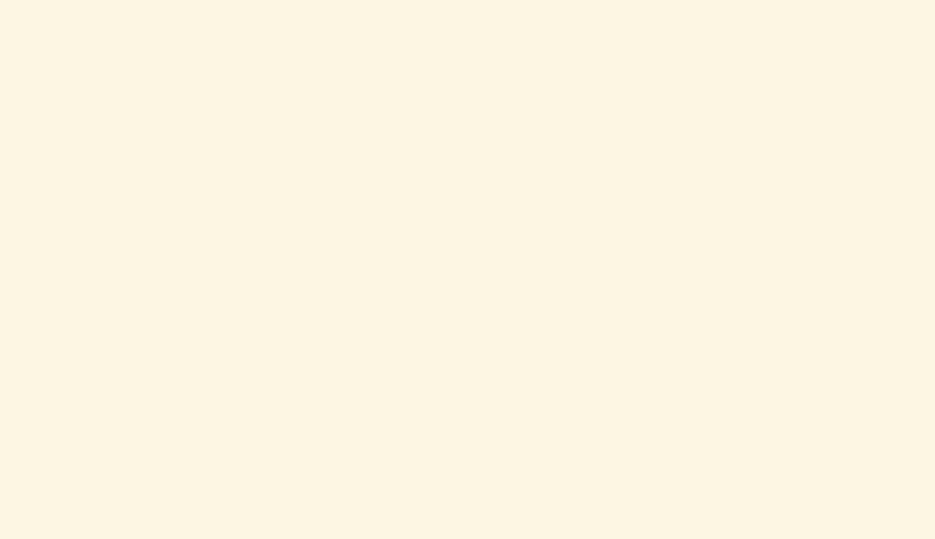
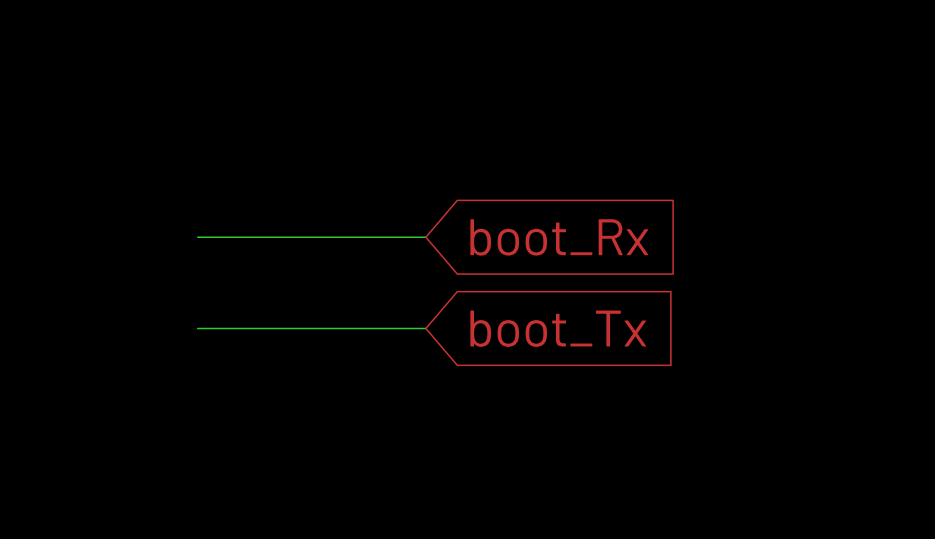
wire: none -> (197, 237) (425, 237)
global label: none -> boot_Rx (559, 237)
wire: none -> (197, 328) (425, 328)
global label: none -> boot_Tx (558, 328)

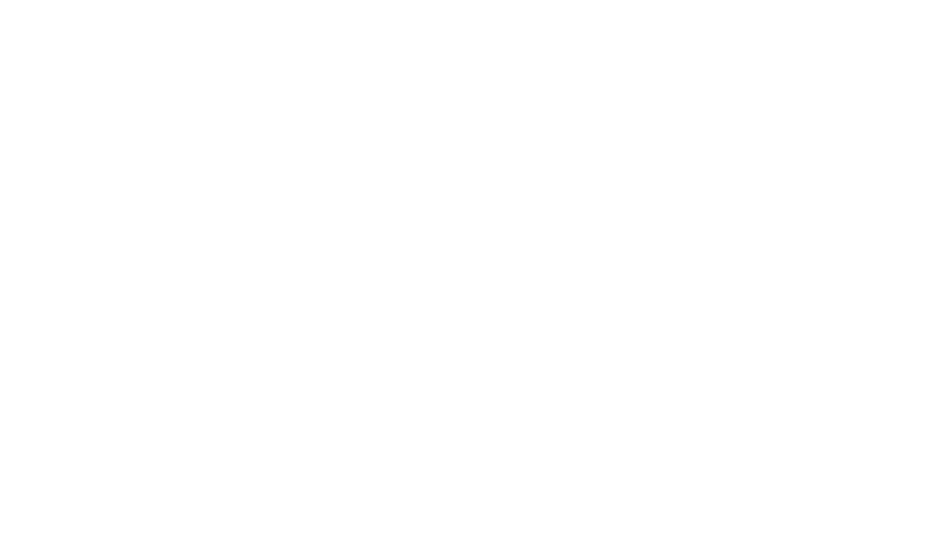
wire: (197, 237) (425, 237) -> none
global label: boot_Rx (559, 237) -> none
wire: (197, 328) (425, 328) -> none
global label: boot_Tx (558, 328) -> none

